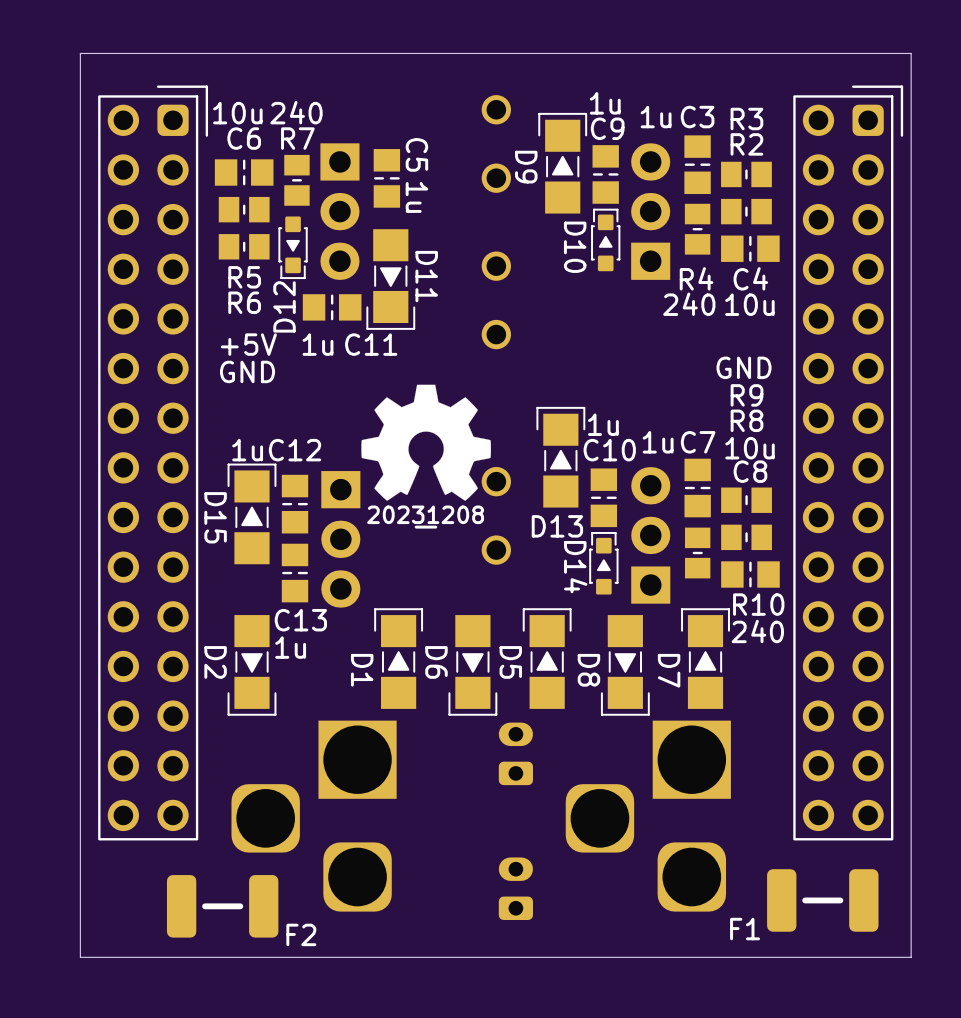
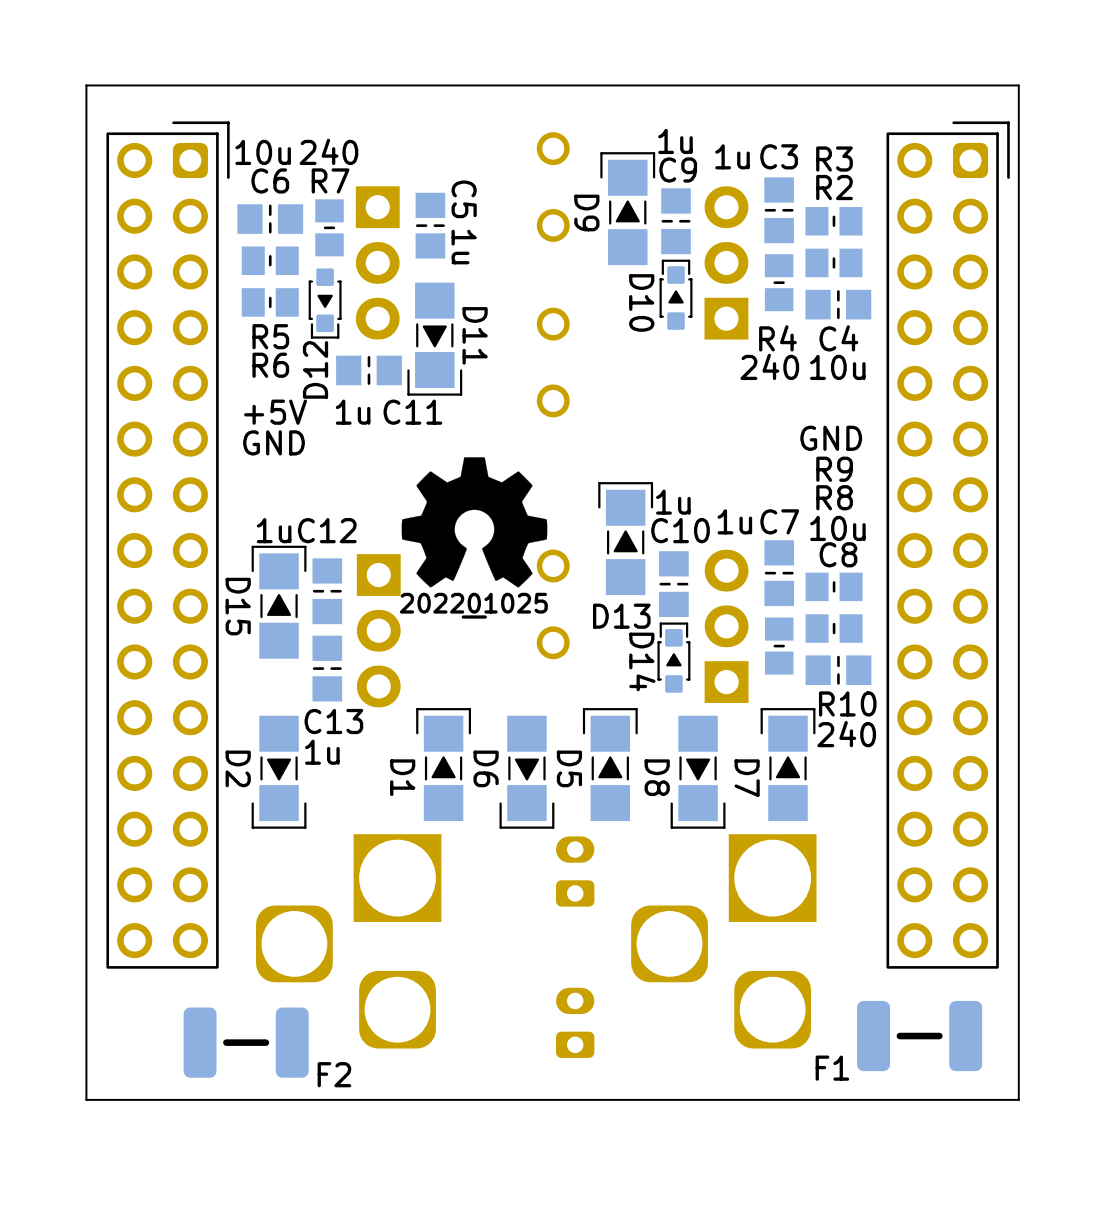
drawing shape: [367, 505, 485, 529] -> [399, 592, 548, 619]

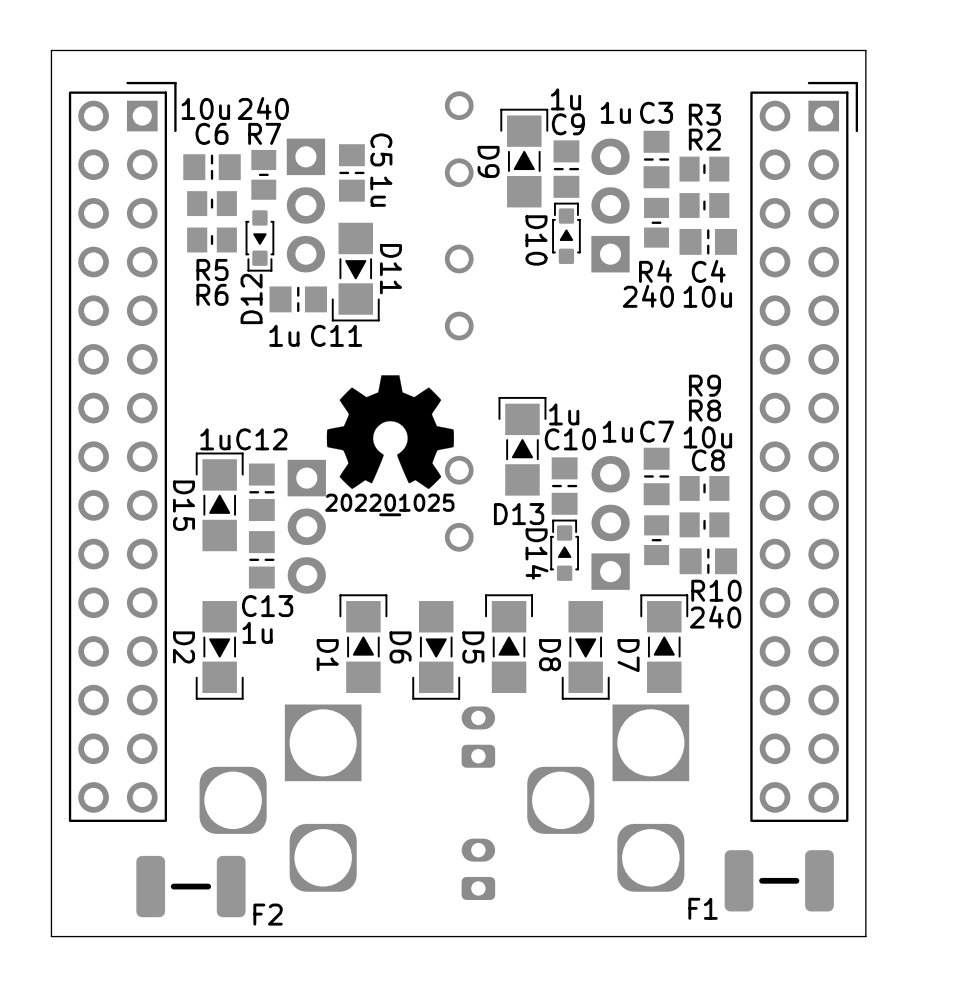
part footprint: [106, 121, 230, 969] -> [68, 81, 177, 822]
part footprint: [886, 121, 1010, 969] -> [750, 81, 859, 822]

